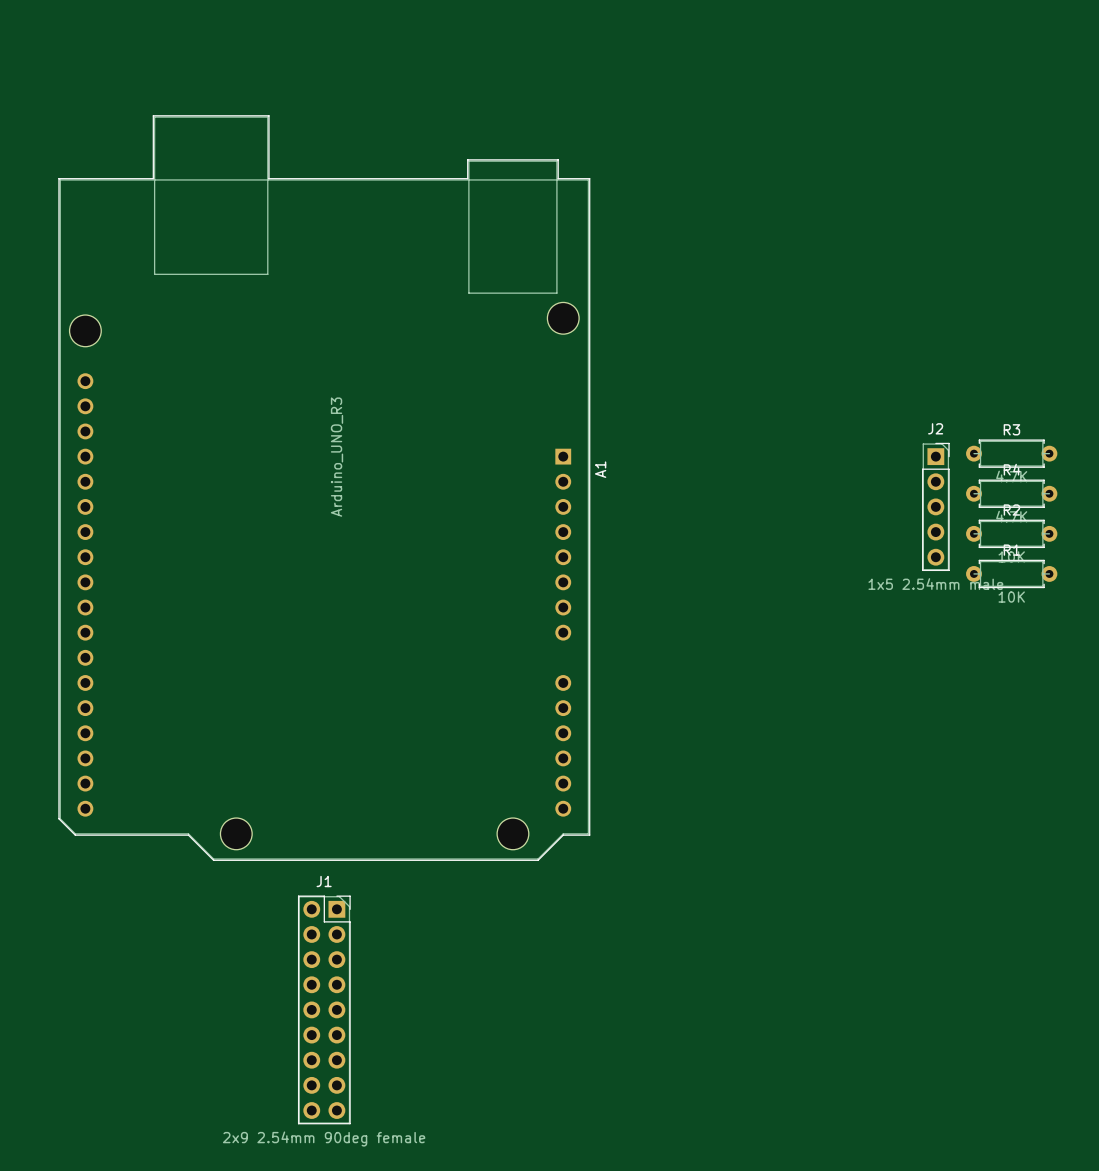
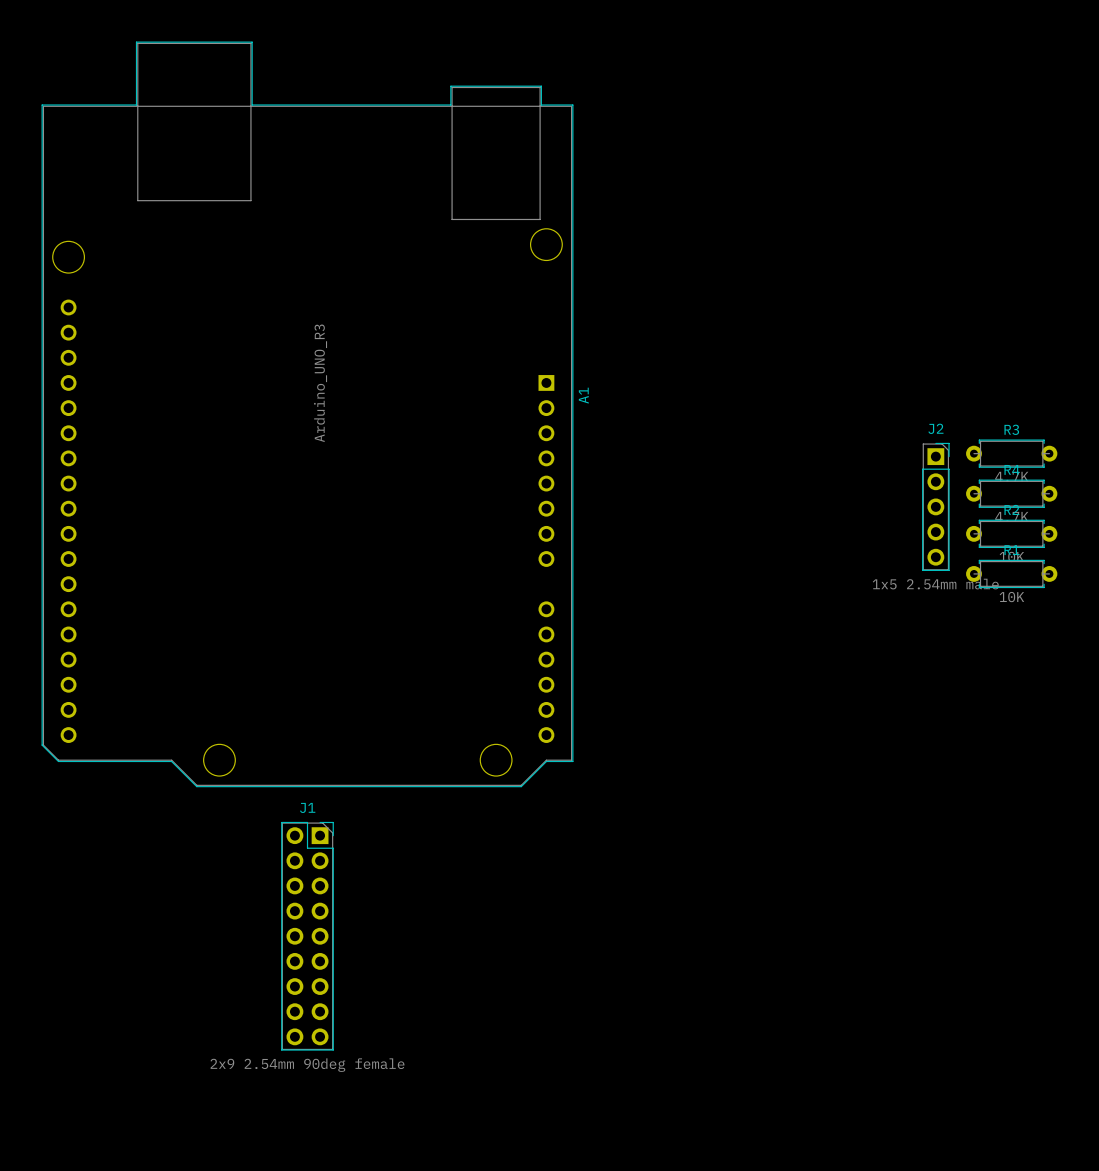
A1 position: (324, 488) -> (307, 414)
J1 position: (324, 1009) -> (307, 936)

